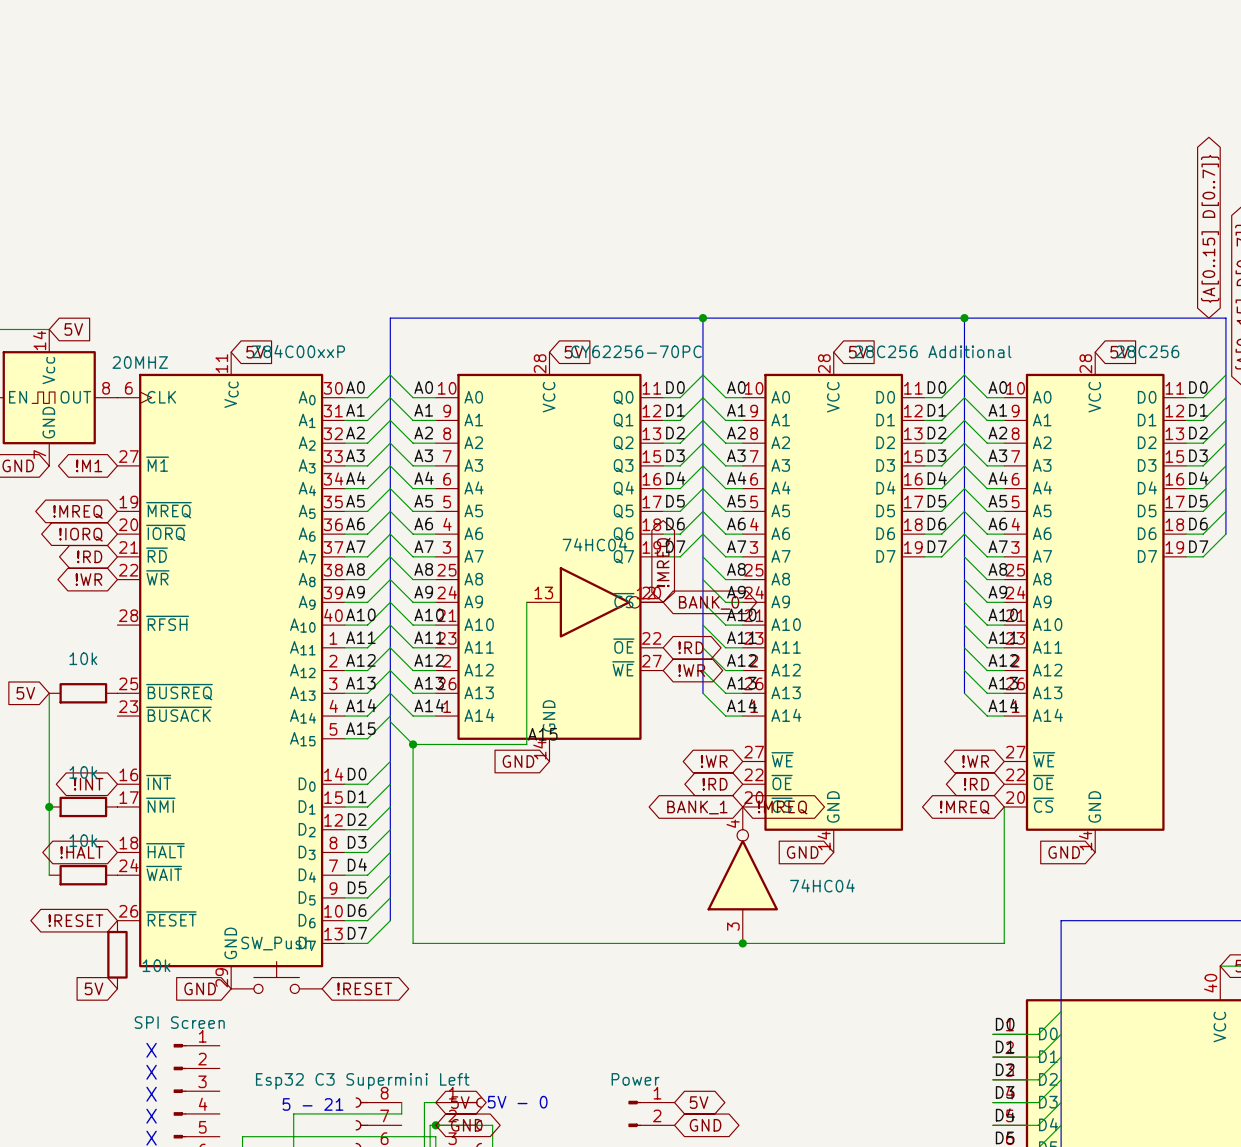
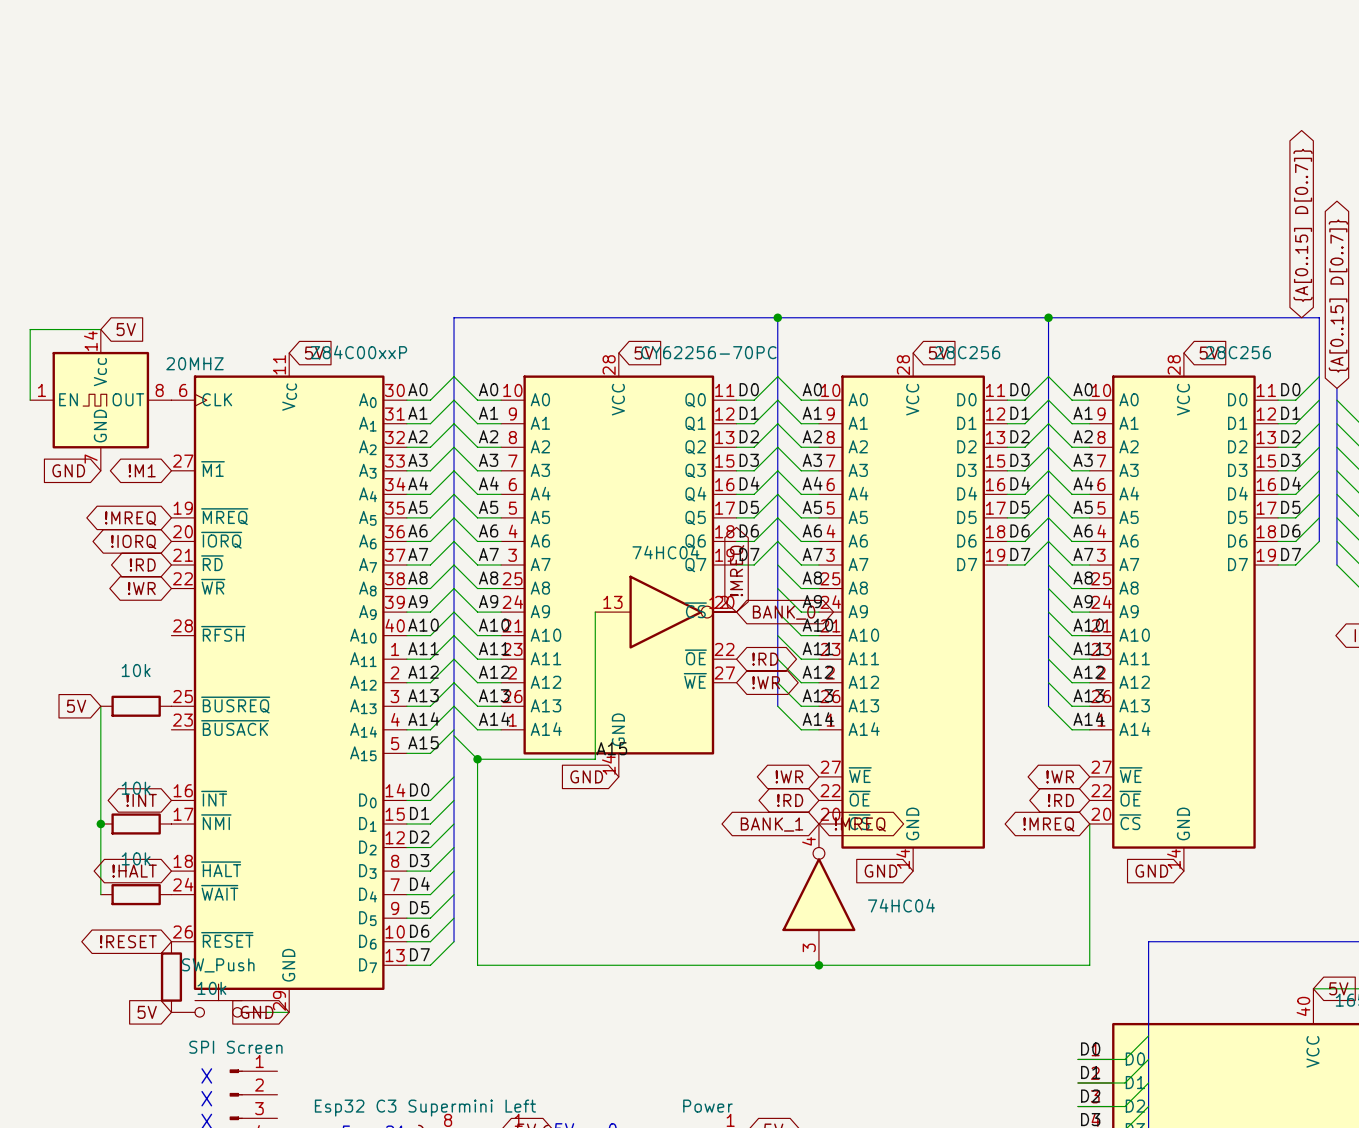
part value: 28C256 Additional (933, 351) -> 28C256 (967, 352)
part position: (276, 977) -> (218, 1000)
wire: none -> (265, 1012) (289, 1012)
global label: !RESET (364, 988) -> none

